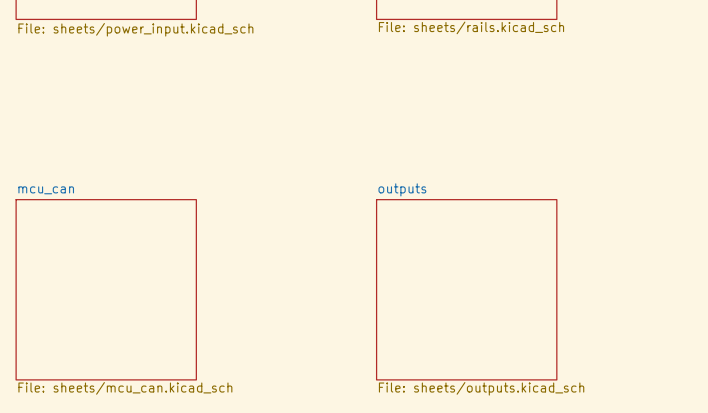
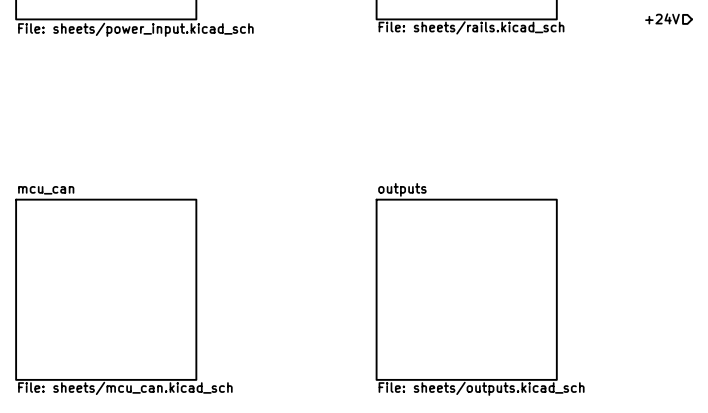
sheet pin: none -> +24V (662, 18)

